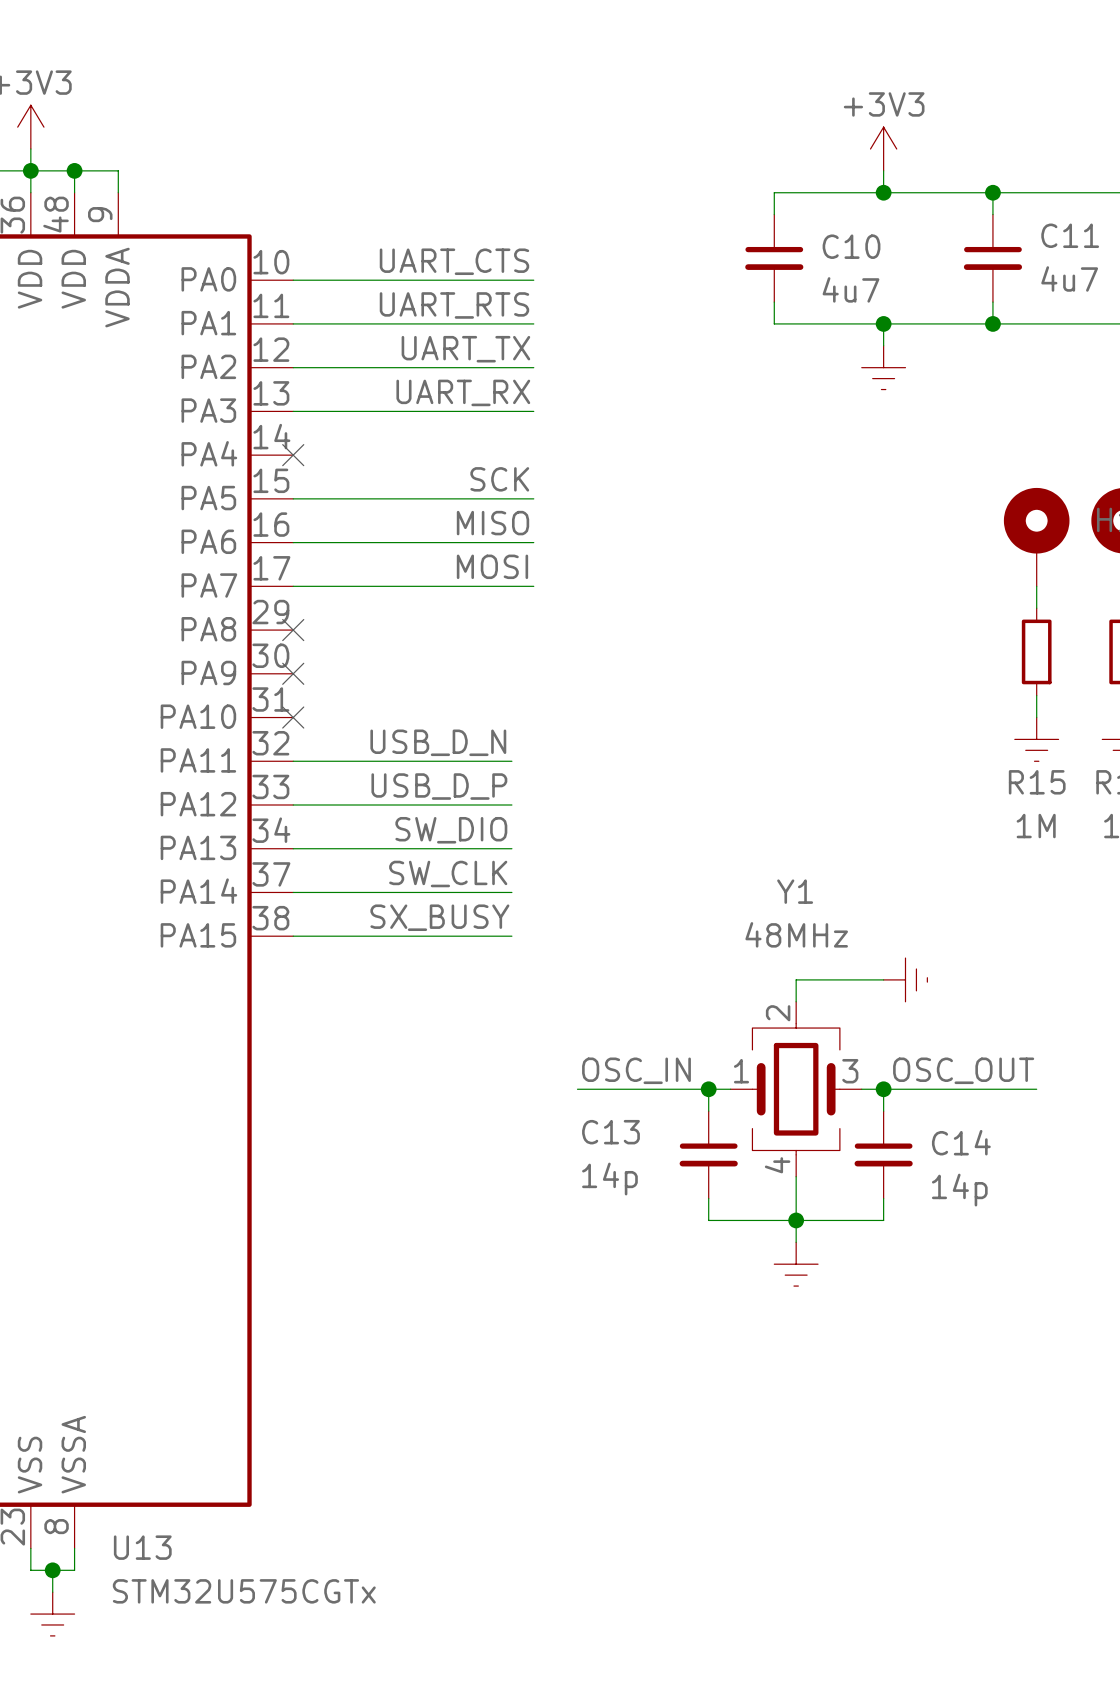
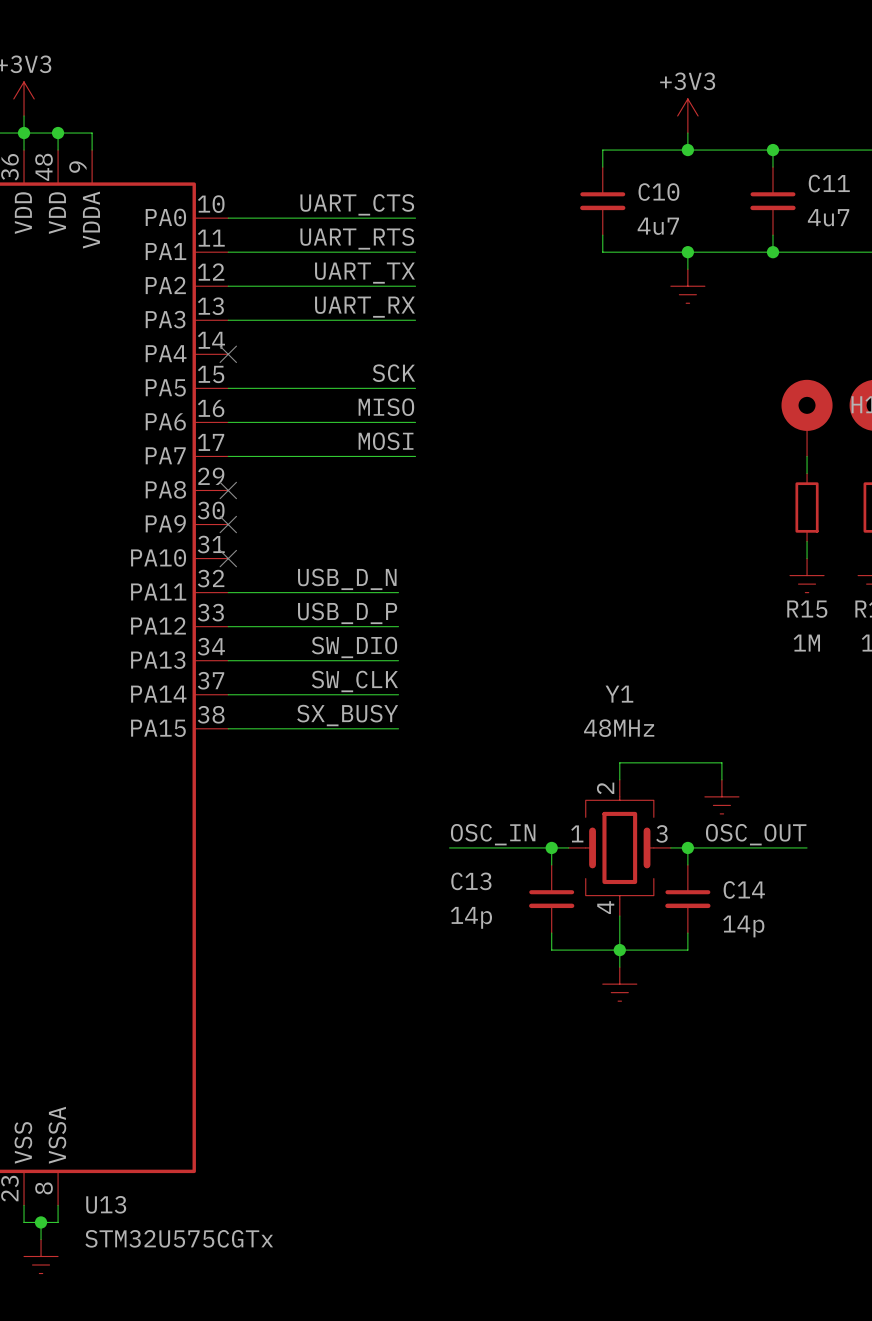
wire: none -> (687, 762) (721, 762) (721, 779)
power symbol rotation: 0° (905, 979) -> 90° clockwise (721, 796)
power symbol position: (905, 979) -> (721, 796)

